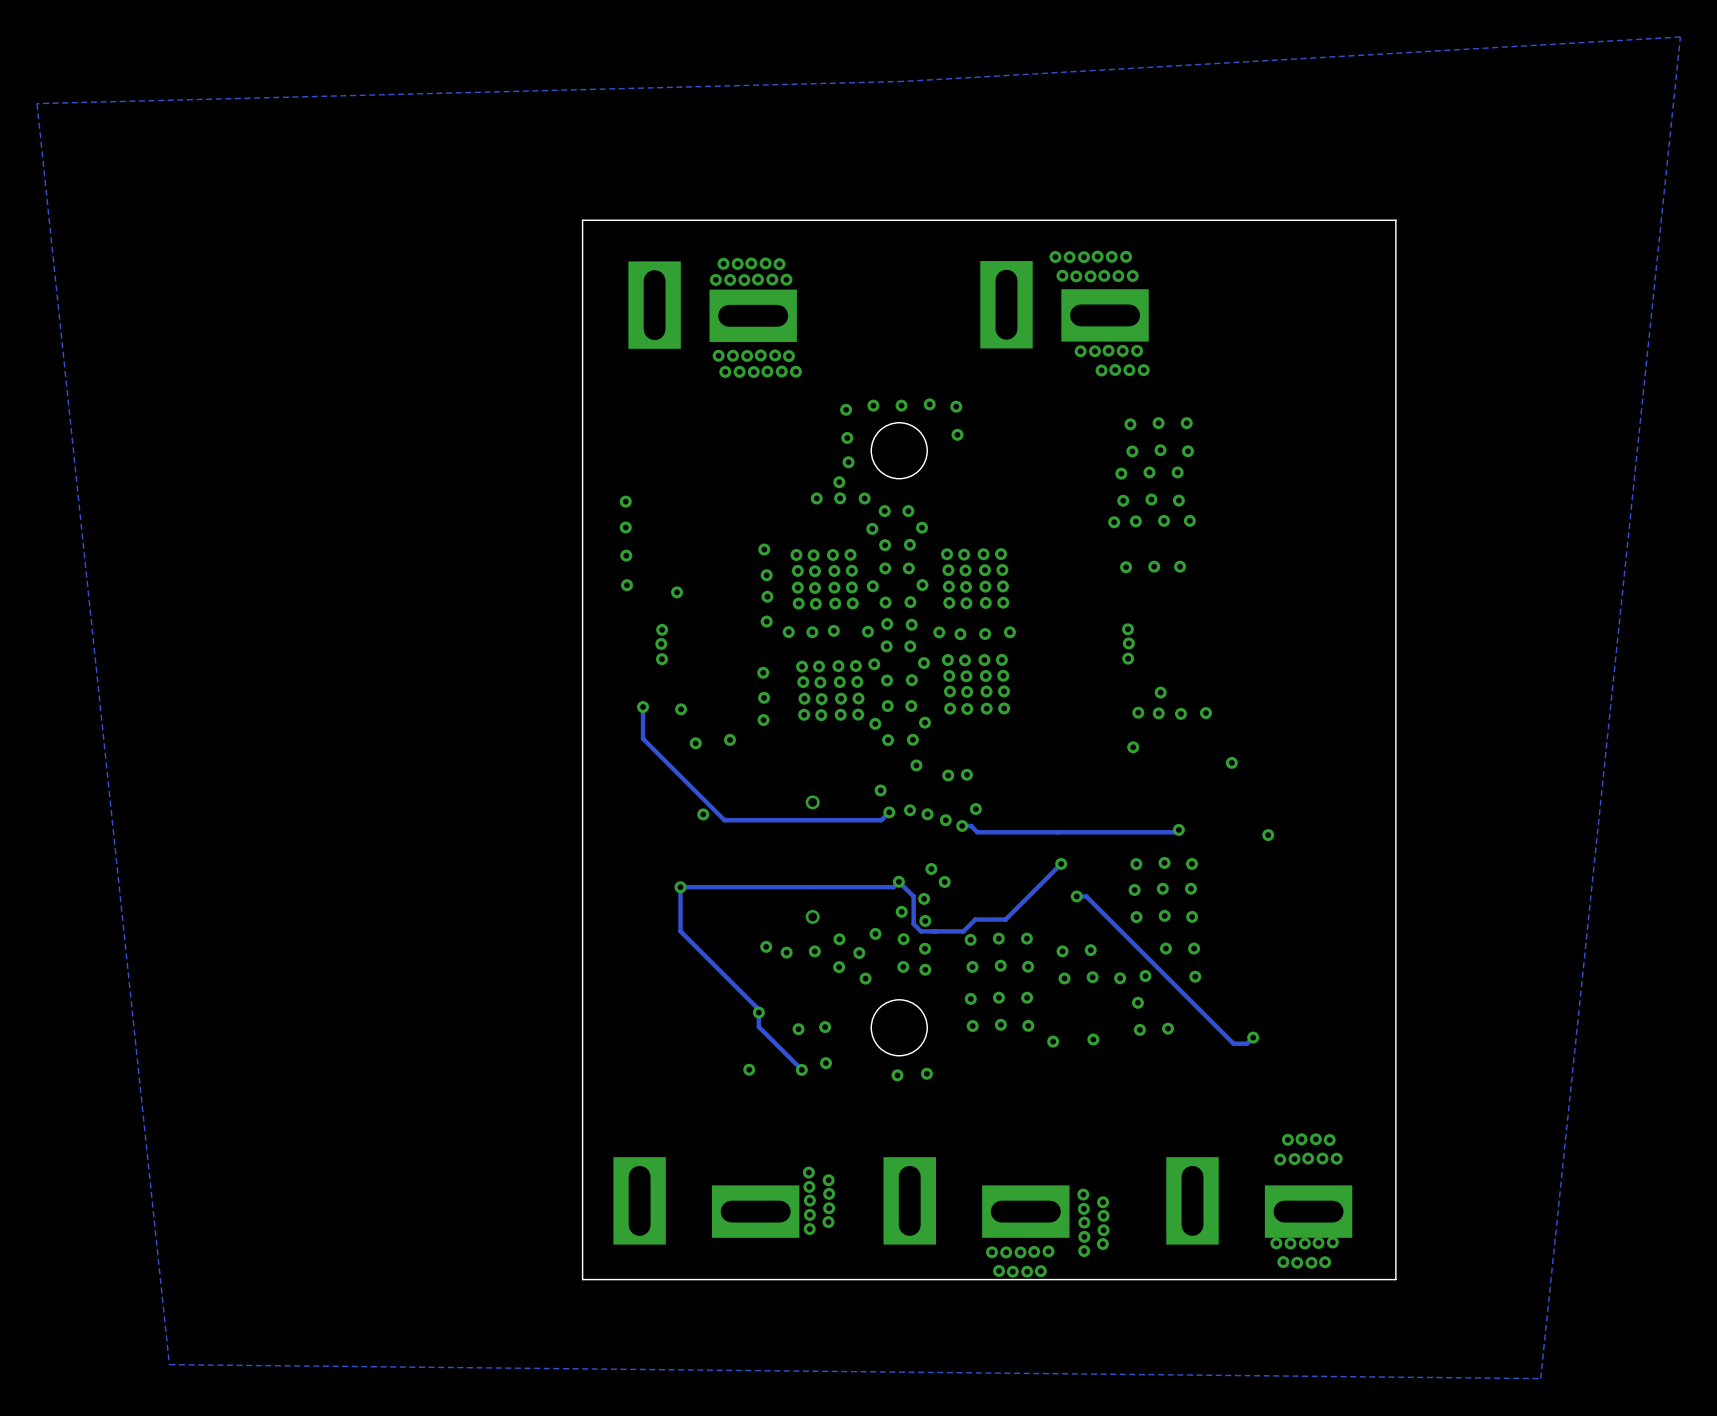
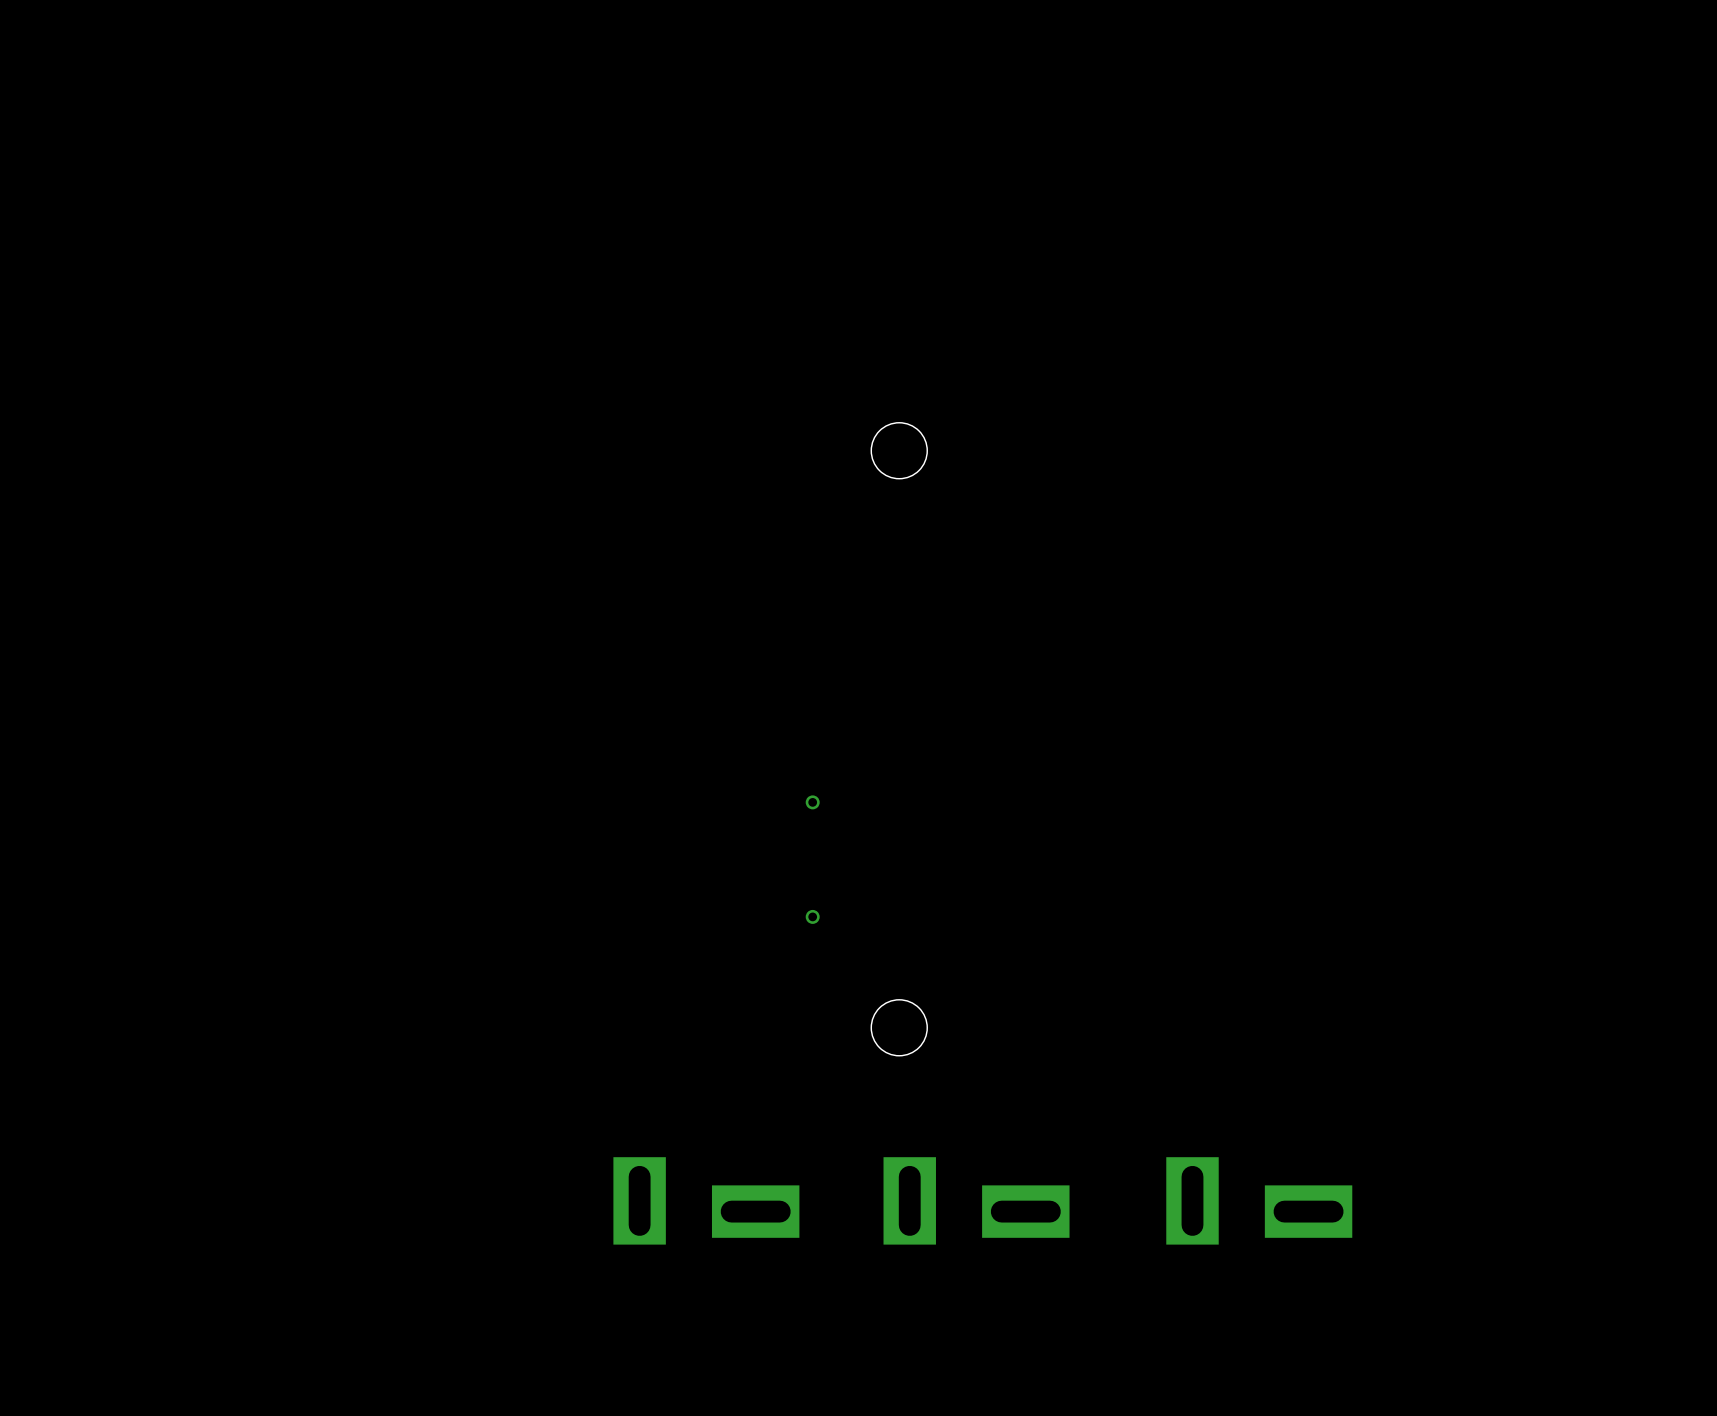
zone outline: (1680, 37) (1540, 1378) (169, 1364) (37, 103) (903, 81) (1680, 37) -> none
board edge: (1395, 220) (1395, 1279) (582, 1279) (582, 220) (1395, 220) -> none
via: (1055, 256) -> none
via: (1097, 256) -> none
via: (1111, 256) -> none
via: (1126, 256) -> none
via: (1069, 257) -> none
via: (1083, 257) -> none
via: (723, 263) -> none
via: (737, 263) -> none
via: (751, 263) -> none
via: (765, 263) -> none
via: (779, 264) -> none
via: (1062, 275) -> none
via: (1104, 275) -> none
via: (1076, 276) -> none
via: (1090, 276) -> none
via: (1118, 276) -> none
via: (1132, 276) -> none
via: (715, 279) -> none
via: (730, 279) -> none
via: (757, 279) -> none
via: (772, 279) -> none
via: (786, 279) -> none
via: (744, 280) -> none
part: (1064, 304) -> none
part: (712, 305) -> none
via: (1108, 350) -> none
via: (1122, 350) -> none
via: (1137, 350) -> none
via: (1080, 351) -> none
via: (1094, 351) -> none
via: (718, 355) -> none
via: (732, 355) -> none
via: (747, 355) -> none
via: (760, 355) -> none
via: (775, 355) -> none
via: (788, 356) -> none
via: (1115, 369) -> none
via: (1101, 370) -> none
via: (1129, 370) -> none
via: (1143, 370) -> none
via: (725, 371) -> none
via: (739, 371) -> none
via: (767, 371) -> none
via: (781, 371) -> none
via: (795, 371) -> none
via: (753, 372) -> none
via: (929, 404) -> none
via: (873, 405) -> none
via: (901, 405) -> none
via: (956, 406) -> none
via: (846, 409) -> none
via: (1158, 423) -> none
via: (1186, 423) -> none
via: (1130, 424) -> none
via: (957, 434) -> none
via: (847, 437) -> none
via: (1160, 450) -> none
via: (1132, 451) -> none
via: (1187, 451) -> none
via: (848, 462) -> none
via: (1149, 472) -> none
via: (1177, 472) -> none
via: (1121, 473) -> none
via: (839, 482) -> none
via: (816, 498) -> none
via: (840, 498) -> none
via: (864, 498) -> none
via: (1151, 499) -> none
via: (1123, 500) -> none
via: (1178, 500) -> none
via: (625, 501) -> none
via: (884, 511) -> none
via: (908, 511) -> none
via: (1163, 520) -> none
via: (1189, 520) -> none
via: (1135, 521) -> none
via: (1114, 522) -> none
via: (625, 527) -> none
via: (921, 527) -> none
via: (872, 528) -> none
via: (909, 544) -> none
via: (885, 545) -> none
via: (764, 549) -> none
via: (796, 554) -> none
via: (832, 554) -> none
via: (850, 554) -> none
via: (946, 554) -> none
via: (964, 554) -> none
via: (983, 554) -> none
via: (1001, 554) -> none
via: (626, 555) -> none
via: (813, 555) -> none
via: (1154, 566) -> none
via: (1180, 566) -> none
via: (1126, 567) -> none
via: (885, 568) -> none
via: (908, 568) -> none
via: (1002, 569) -> none
via: (797, 570) -> none
via: (834, 570) -> none
via: (851, 570) -> none
via: (948, 570) -> none
via: (965, 570) -> none
via: (984, 570) -> none
via: (814, 571) -> none
via: (766, 575) -> none
via: (626, 585) -> none
via: (922, 585) -> none
via: (872, 586) -> none
via: (948, 586) -> none
via: (966, 586) -> none
via: (985, 586) -> none
via: (1002, 586) -> none
via: (797, 587) -> none
via: (834, 587) -> none
via: (851, 587) -> none
via: (814, 588) -> none
via: (677, 592) -> none
via: (767, 596) -> none
via: (885, 602) -> none
via: (910, 602) -> none
via: (949, 602) -> none
via: (985, 602) -> none
via: (1003, 602) -> none
via: (798, 603) -> none
via: (815, 603) -> none
via: (835, 603) -> none
via: (852, 603) -> none
via: (966, 603) -> none
via: (766, 621) -> none
via: (887, 624) -> none
via: (911, 624) -> none
via: (662, 629) -> none
via: (1127, 629) -> none
via: (833, 630) -> none
via: (867, 631) -> none
via: (788, 632) -> none
via: (812, 632) -> none
via: (939, 632) -> none
via: (1009, 632) -> none
via: (985, 633) -> none
via: (960, 634) -> none
via: (661, 643) -> none
via: (1128, 643) -> none
via: (886, 646) -> none
via: (910, 646) -> none
via: (1128, 658) -> none
via: (661, 659) -> none
via: (1001, 659) -> none
via: (947, 660) -> none
via: (965, 660) -> none
via: (984, 660) -> none
via: (923, 663) -> none
via: (874, 664) -> none
via: (855, 665) -> none
via: (802, 666) -> none
via: (818, 666) -> none
via: (838, 666) -> none
via: (763, 672) -> none
via: (949, 675) -> none
via: (985, 675) -> none
via: (1003, 675) -> none
via: (966, 676) -> none
via: (887, 680) -> none
via: (911, 680) -> none
via: (857, 681) -> none
via: (803, 682) -> none
via: (820, 682) -> none
via: (839, 682) -> none
via: (949, 691) -> none
via: (967, 691) -> none
via: (986, 691) -> none
via: (1004, 691) -> none
via: (1160, 692) -> none
via: (764, 697) -> none
via: (804, 698) -> none
via: (841, 698) -> none
via: (858, 698) -> none
via: (821, 699) -> none
via: (887, 706) -> none
via: (911, 706) -> none
track: (643, 707) (643, 738) (724, 820) (881, 820) (889, 812) -> none
via: (643, 707) -> none
via: (950, 708) -> none
via: (986, 708) -> none
via: (1004, 708) -> none
via: (681, 709) -> none
via: (967, 709) -> none
via: (1138, 712) -> none
via: (1158, 713) -> none
via: (1180, 713) -> none
via: (1205, 713) -> none
via: (804, 714) -> none
via: (840, 714) -> none
via: (858, 714) -> none
via: (821, 715) -> none
via: (763, 720) -> none
via: (924, 722) -> none
via: (875, 723) -> none
via: (729, 739) -> none
via: (912, 739) -> none
via: (888, 740) -> none
via: (695, 743) -> none
via: (1133, 747) -> none
via: (1231, 762) -> none
via: (916, 765) -> none
via: (966, 774) -> none
via: (948, 775) -> none
via: (880, 790) -> none
via: (975, 809) -> none
via: (910, 810) -> none
via: (889, 812) -> none
via: (703, 814) -> none
via: (927, 814) -> none
via: (945, 820) -> none
track: (962, 825) (971, 825) (977, 832) (1176, 832) (1178, 829) -> none
via: (962, 825) -> none
via: (1178, 829) -> none
via: (1268, 835) -> none
via: (1164, 862) -> none
track: (1061, 863) (1005, 919) (975, 919) (963, 931) (920, 931) (913, 924) (913, 896) (898, 881) -> none
via: (1061, 863) -> none
via: (1191, 863) -> none
via: (1136, 864) -> none
via: (931, 869) -> none
track: (901, 879) (893, 887) (680, 887) (680, 931) (758, 1009) (758, 1026) (801, 1069) -> none
via: (898, 881) -> none
via: (944, 881) -> none
via: (680, 887) -> none
via: (1162, 888) -> none
via: (1190, 888) -> none
via: (1134, 889) -> none
track: (1076, 896) (1086, 896) (1233, 1043) (1247, 1043) (1253, 1037) -> none
via: (1076, 896) -> none
via: (924, 898) -> none
via: (901, 911) -> none
via: (1164, 915) -> none
via: (1192, 916) -> none
via: (1136, 917) -> none
via: (925, 920) -> none
via: (875, 933) -> none
via: (998, 938) -> none
via: (1026, 938) -> none
via: (839, 939) -> none
via: (903, 939) -> none
via: (970, 939) -> none
via: (766, 946) -> none
via: (924, 948) -> none
via: (1165, 948) -> none
via: (1194, 948) -> none
via: (1090, 950) -> none
via: (814, 951) -> none
via: (1062, 951) -> none
via: (786, 952) -> none
via: (859, 953) -> none
via: (1000, 965) -> none
via: (903, 966) -> none
via: (972, 966) -> none
via: (1028, 966) -> none
via: (839, 967) -> none
via: (925, 969) -> none
via: (1145, 976) -> none
via: (1195, 976) -> none
via: (1092, 977) -> none
via: (865, 978) -> none
via: (1064, 978) -> none
via: (1120, 978) -> none
via: (998, 997) -> none
via: (1027, 997) -> none
via: (970, 998) -> none
via: (1137, 1002) -> none
via: (758, 1012) -> none
via: (1000, 1024) -> none
via: (1028, 1025) -> none
via: (972, 1026) -> none
via: (825, 1027) -> none
via: (1168, 1028) -> none
via: (798, 1029) -> none
via: (1139, 1029) -> none
via: (1253, 1037) -> none
via: (1093, 1039) -> none
via: (1053, 1041) -> none
via: (825, 1063) -> none
via: (749, 1069) -> none
via: (801, 1069) -> none
via: (926, 1073) -> none
via: (897, 1075) -> none
via: (1287, 1139) -> none
via: (1301, 1139) -> none
via: (1315, 1139) -> none
via: (1329, 1139) -> none
via: (1308, 1158) -> none
via: (1322, 1158) -> none
via: (1336, 1158) -> none
via: (1280, 1159) -> none
via: (1294, 1159) -> none
via: (808, 1172) -> none
via: (828, 1180) -> none
via: (809, 1186) -> none
via: (829, 1193) -> none
via: (1083, 1194) -> none
via: (809, 1200) -> none
via: (1103, 1202) -> none
via: (829, 1208) -> none
via: (1083, 1208) -> none
via: (809, 1214) -> none
via: (1103, 1215) -> none
via: (828, 1222) -> none
via: (1084, 1222) -> none
via: (809, 1229) -> none
via: (1103, 1230) -> none
via: (1084, 1236) -> none
via: (1318, 1242) -> none
via: (1332, 1242) -> none
via: (1276, 1243) -> none
via: (1290, 1243) -> none
via: (1304, 1243) -> none
via: (1102, 1244) -> none
via: (1034, 1251) -> none
via: (1048, 1251) -> none
via: (1084, 1251) -> none
via: (992, 1252) -> none
via: (1006, 1252) -> none
via: (1020, 1252) -> none
via: (1283, 1262) -> none
via: (1297, 1262) -> none
via: (1311, 1262) -> none
via: (1325, 1262) -> none
via: (999, 1270) -> none
via: (1012, 1271) -> none
via: (1027, 1271) -> none
via: (1040, 1271) -> none

